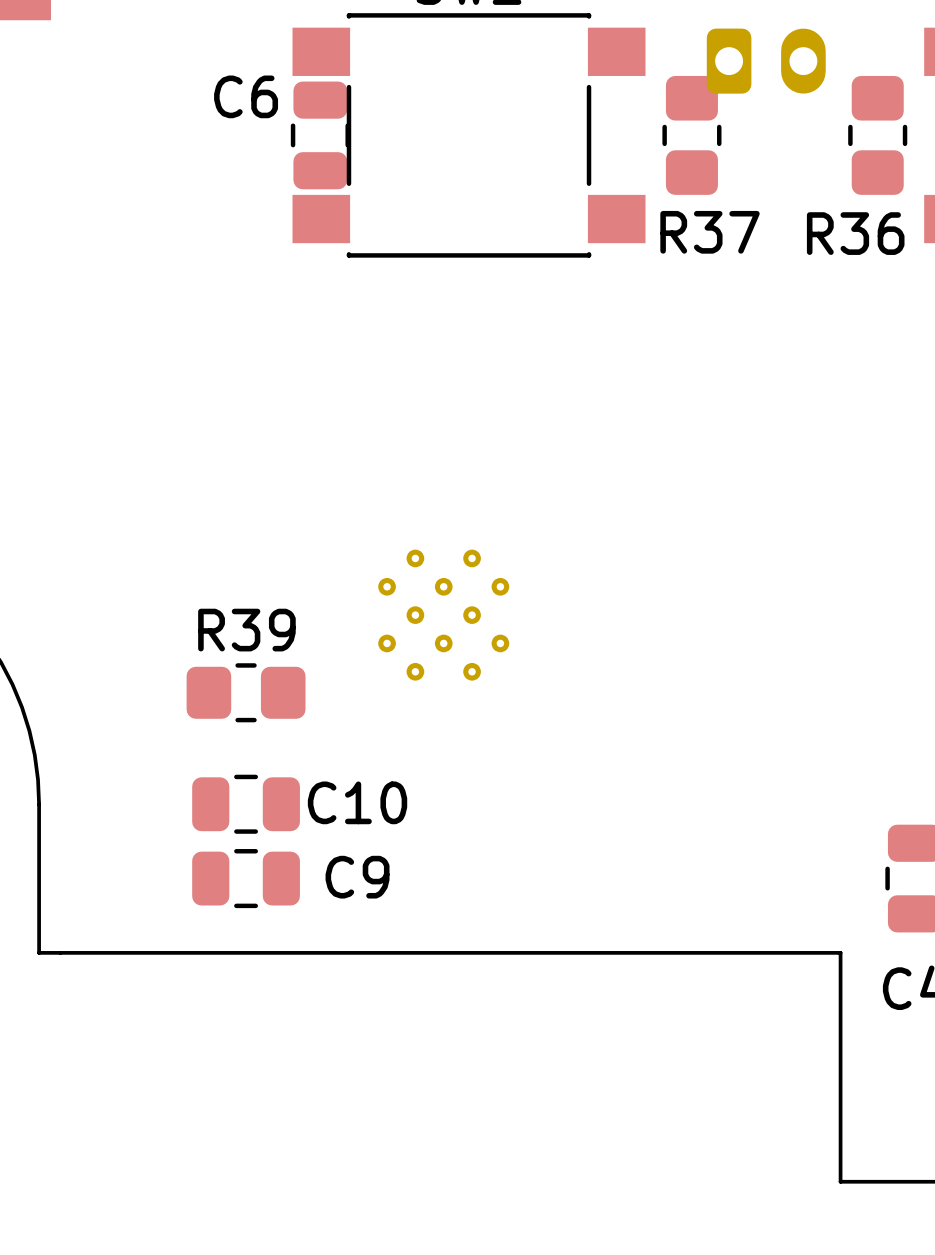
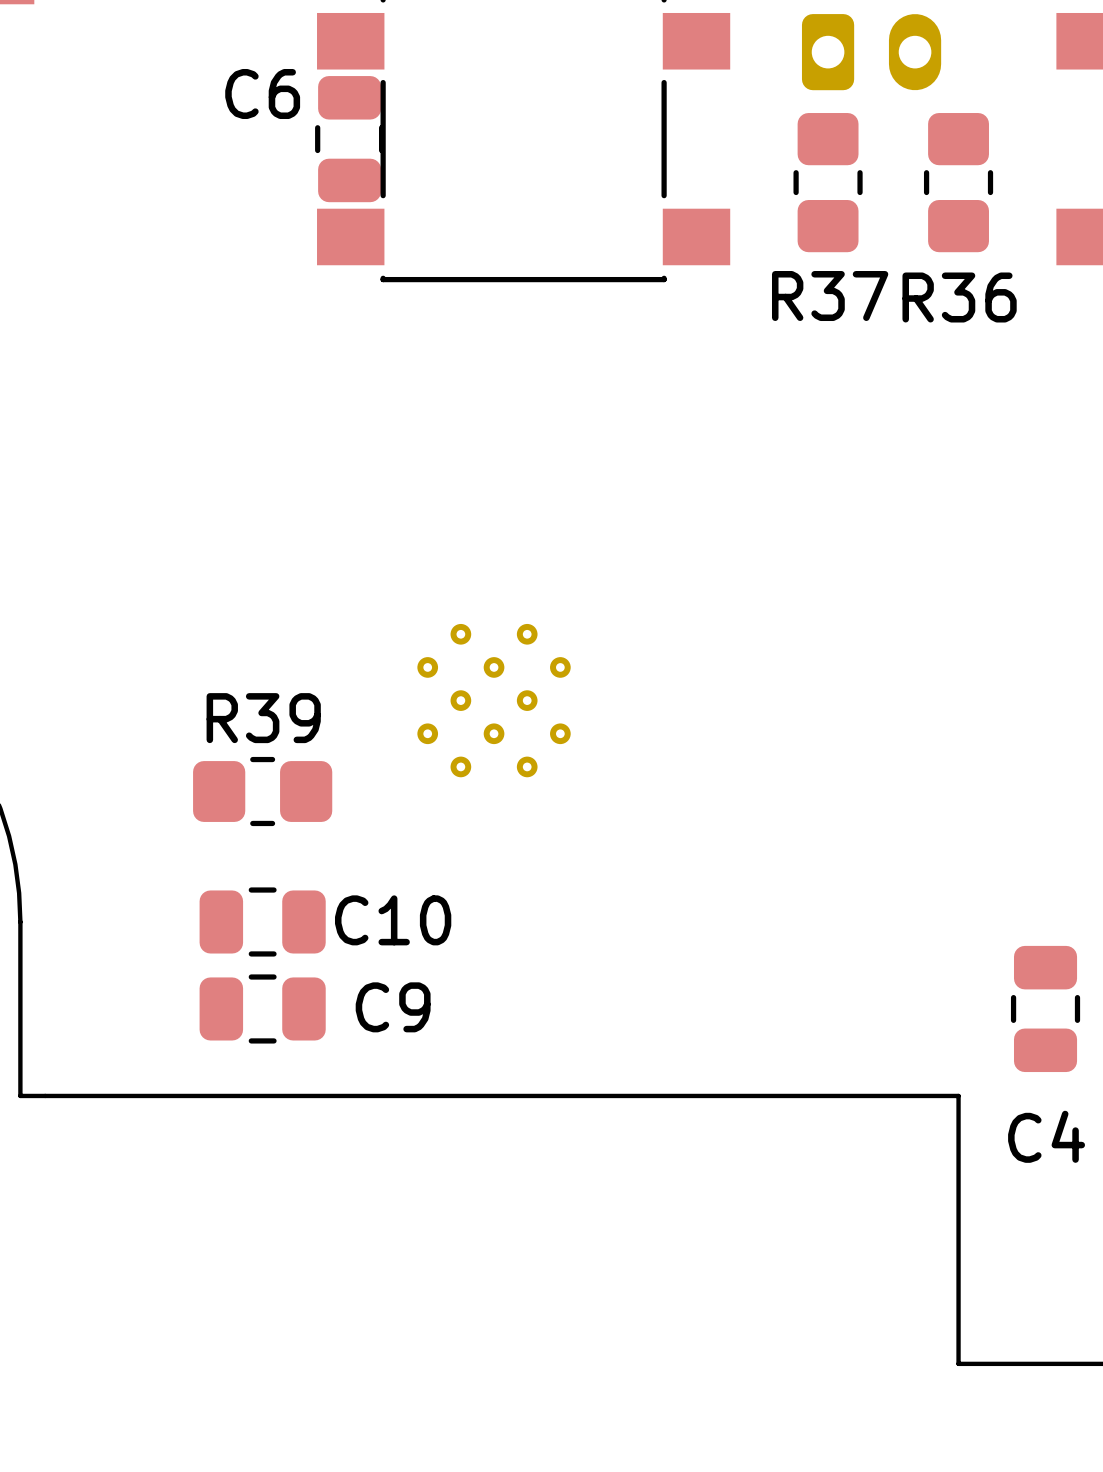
R37 position: (691, 135) -> (828, 182)
R36 position: (877, 135) -> (958, 182)
R37 name position: R37 (710, 232) -> R37 (830, 296)
R36 name position: R36 (855, 233) -> R36 (959, 297)

